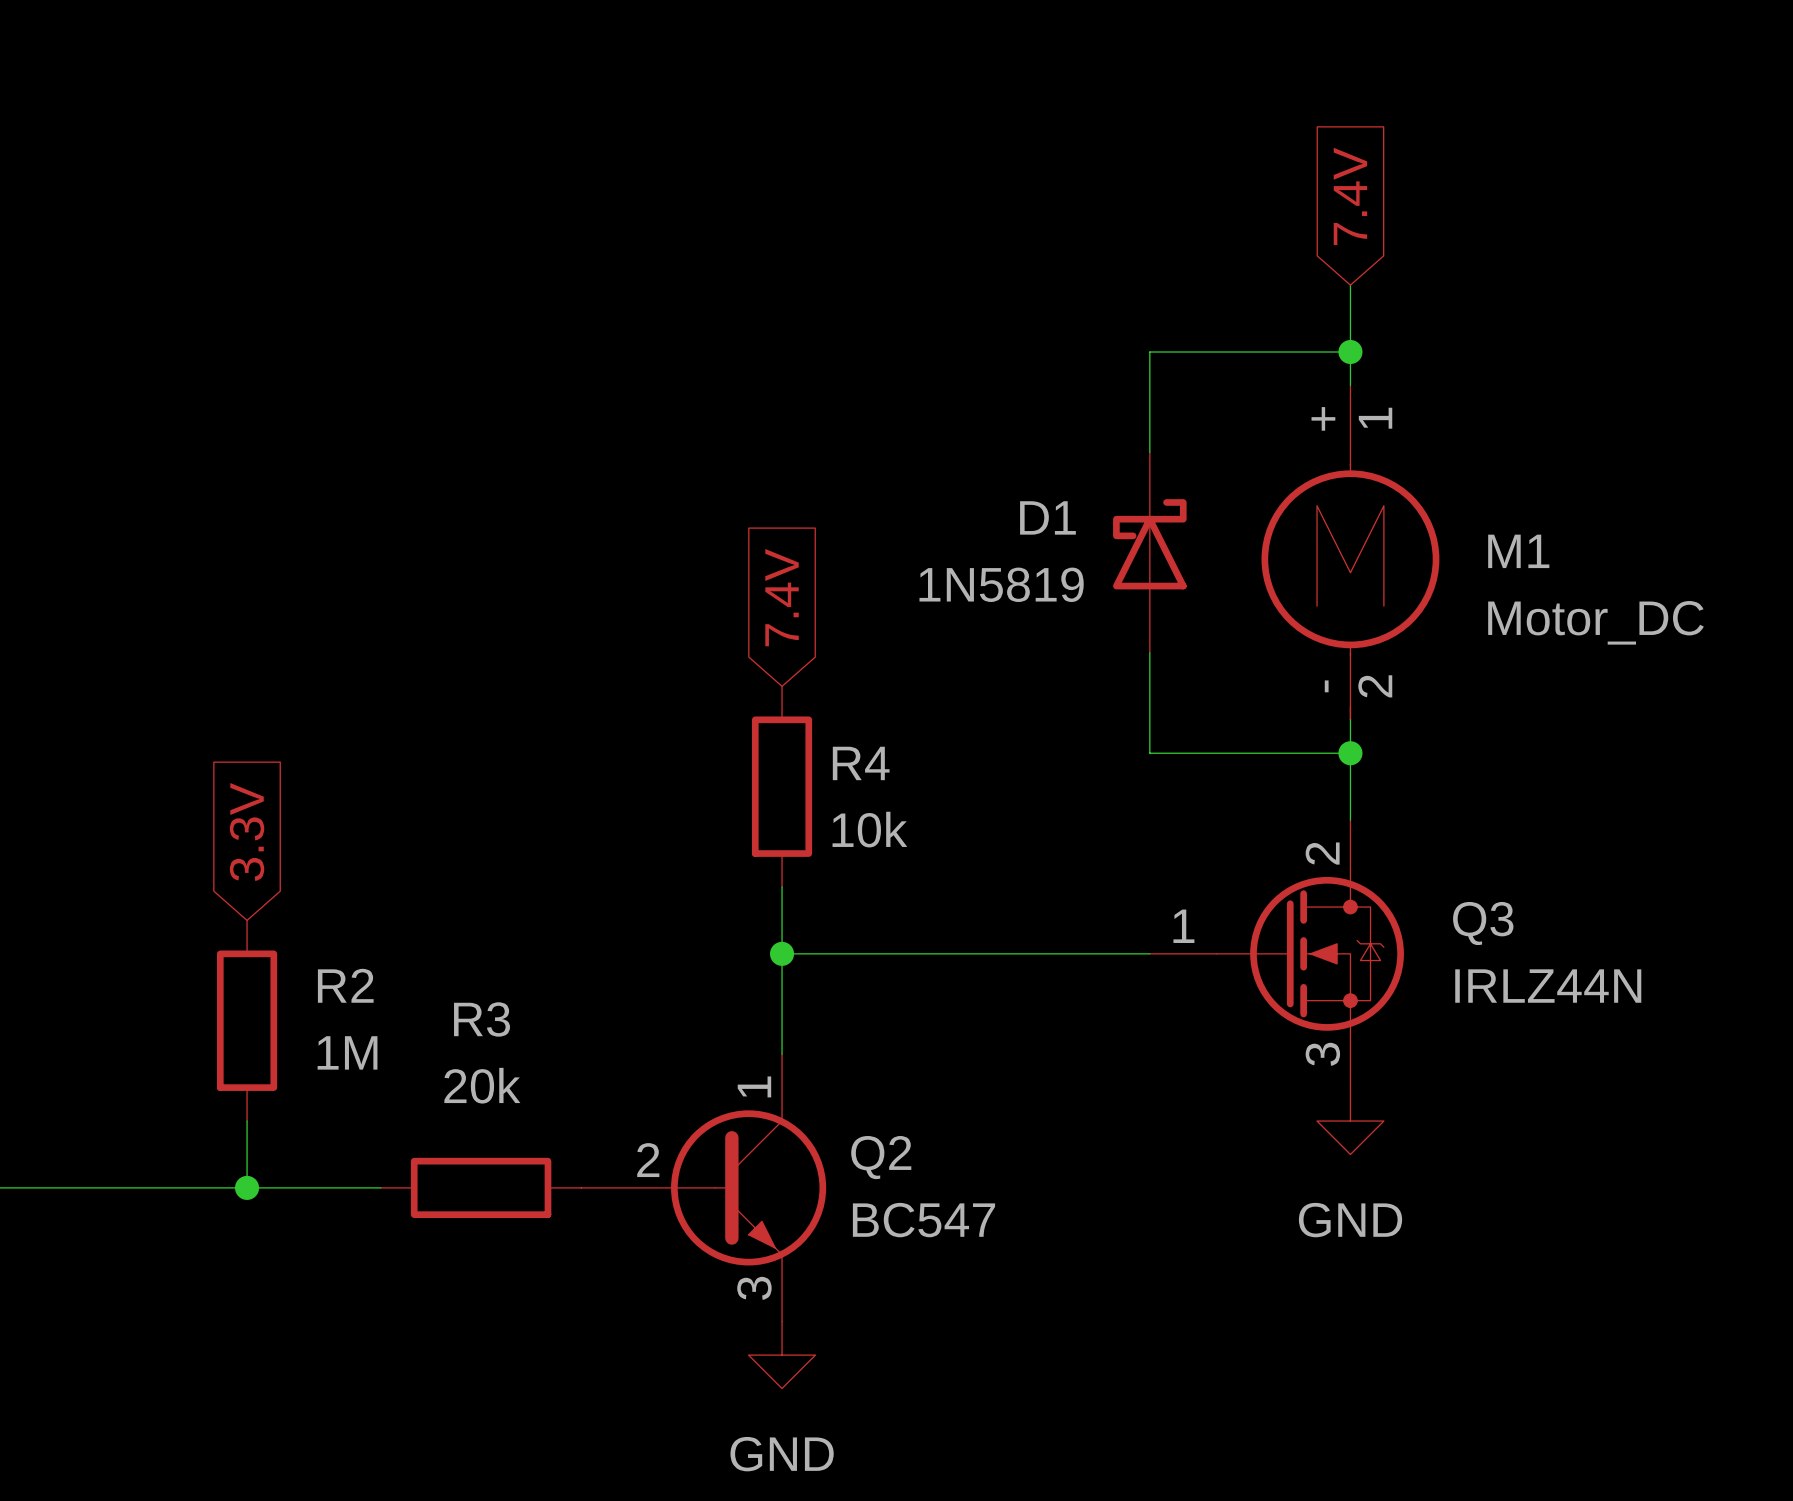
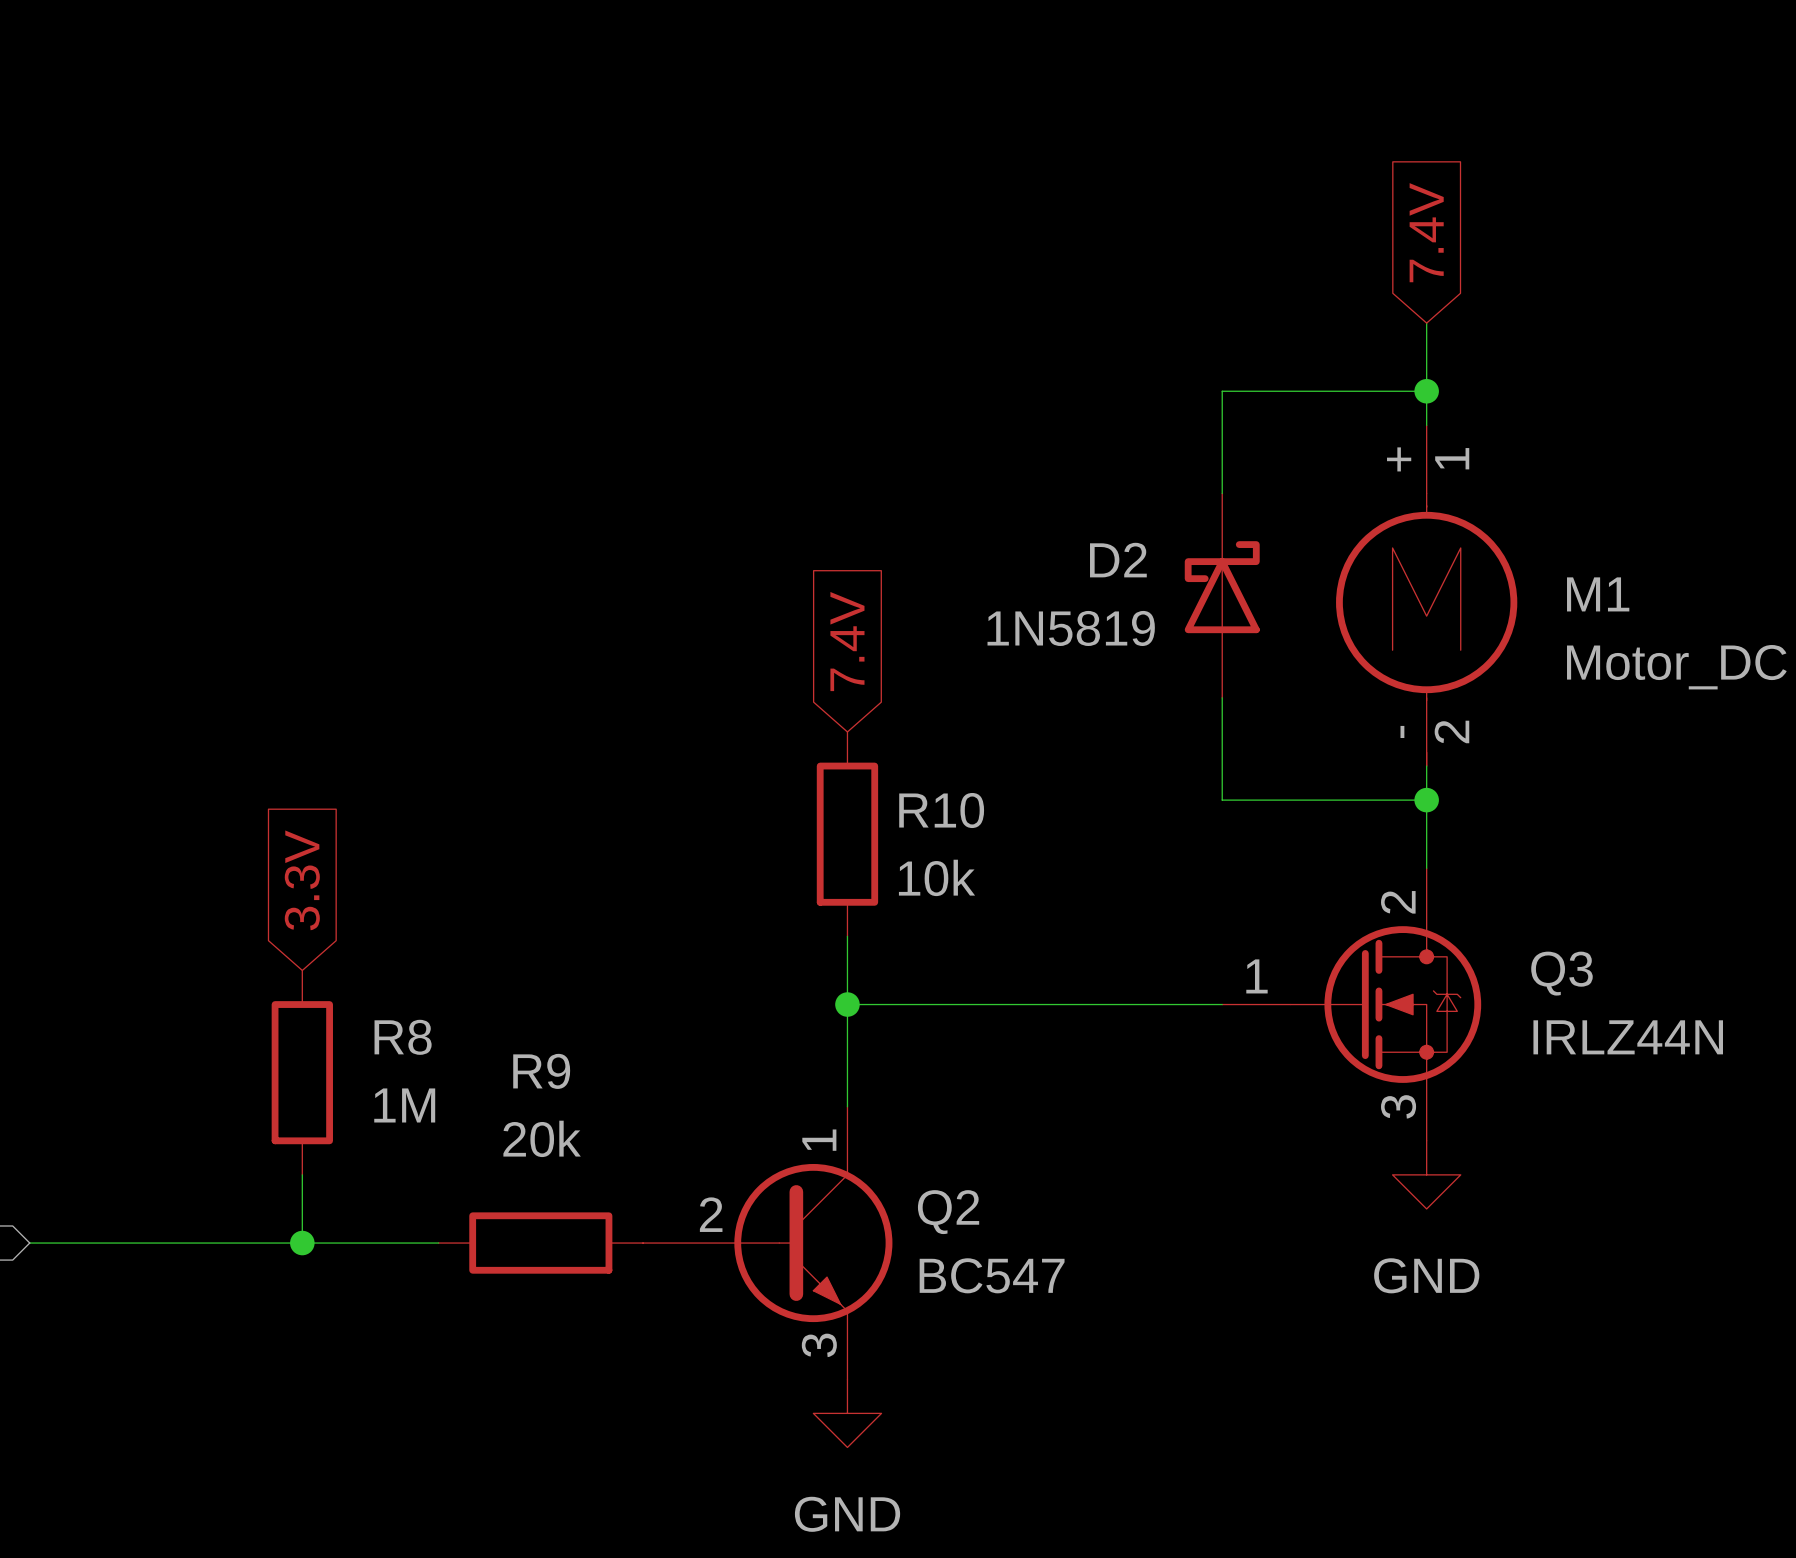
D1 name: D1 (1047, 517) -> D2 (1118, 560)
R4 name: R4 (861, 763) -> R10 (941, 810)
R2 name: R2 (345, 985) -> R8 (403, 1037)
R3 name: R3 (482, 1019) -> R9 (541, 1071)

